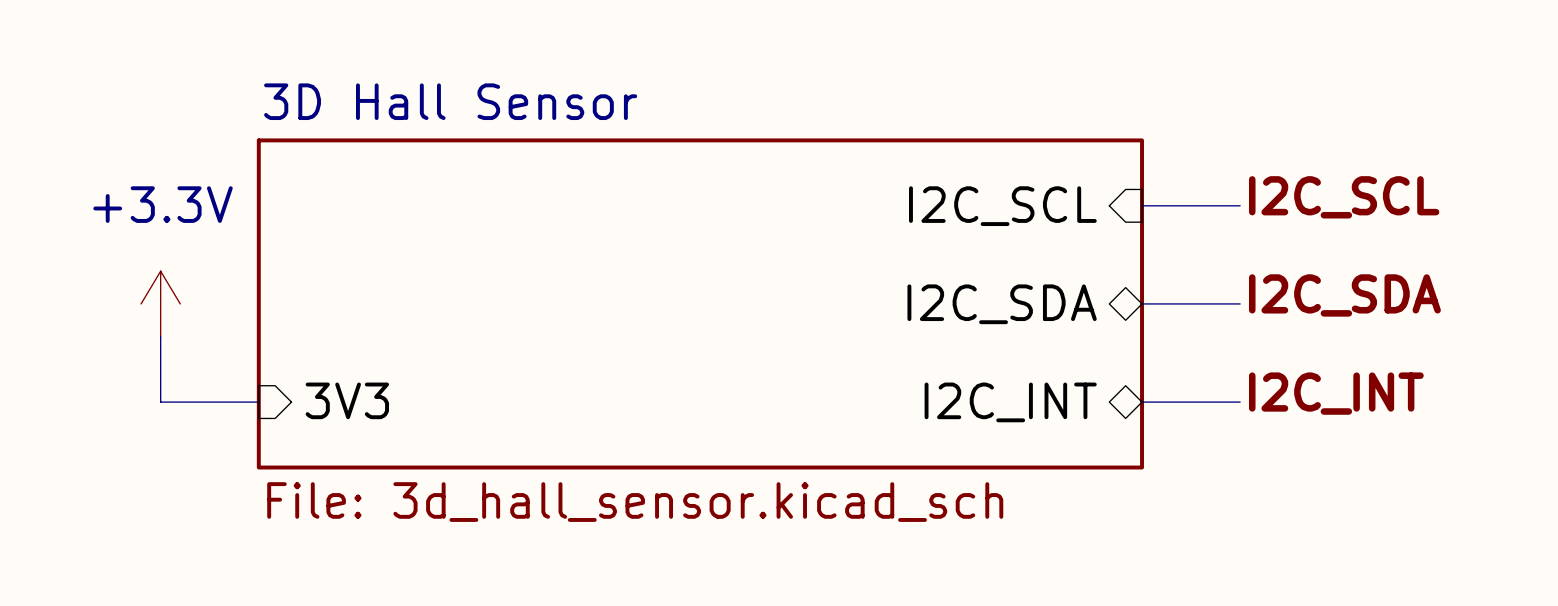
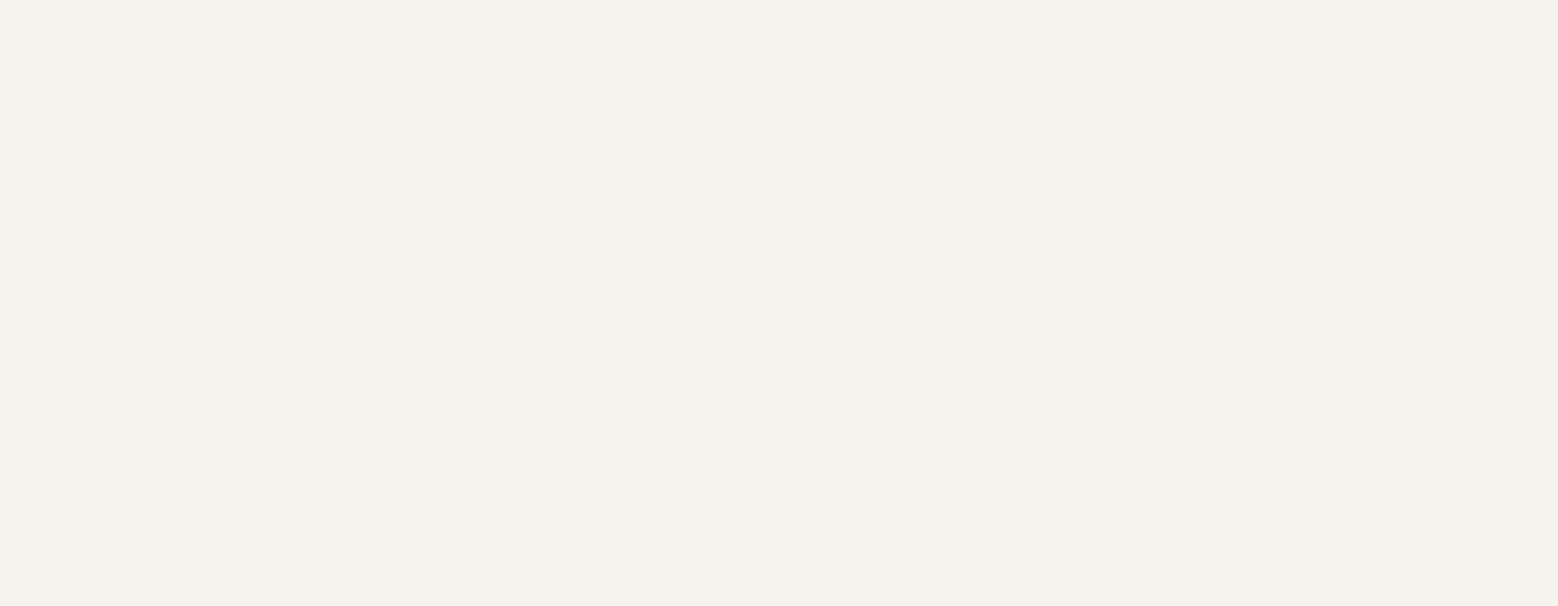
label: I2C_SCL (1344, 197) -> none
wire: (1142, 205) (1240, 205) -> none
sheet pin: I2C_SCL (1002, 206) -> none
label: I2C_SDA (1344, 295) -> none
power symbol: +3.3V (160, 303) -> none
sheet 3D Hall Sensor: File: 3d_hall_sensor.kicad_sch (700, 303) -> none
wire: (1142, 303) (1240, 303) -> none
sheet pin: I2C_SDA (1002, 304) -> none
wire: (160, 336) (160, 402) (258, 402) -> none
label: I2C_INT (1336, 393) -> none
sheet pin: 3V3 (347, 400) -> none
sheet pin: I2C_INT (1010, 402) -> none
wire: (1142, 402) (1240, 402) -> none

